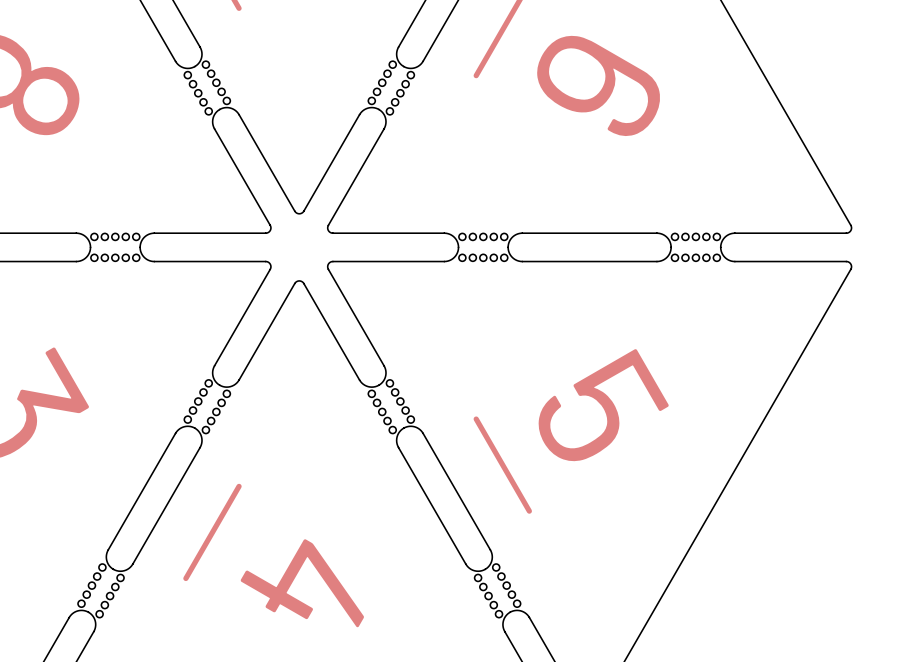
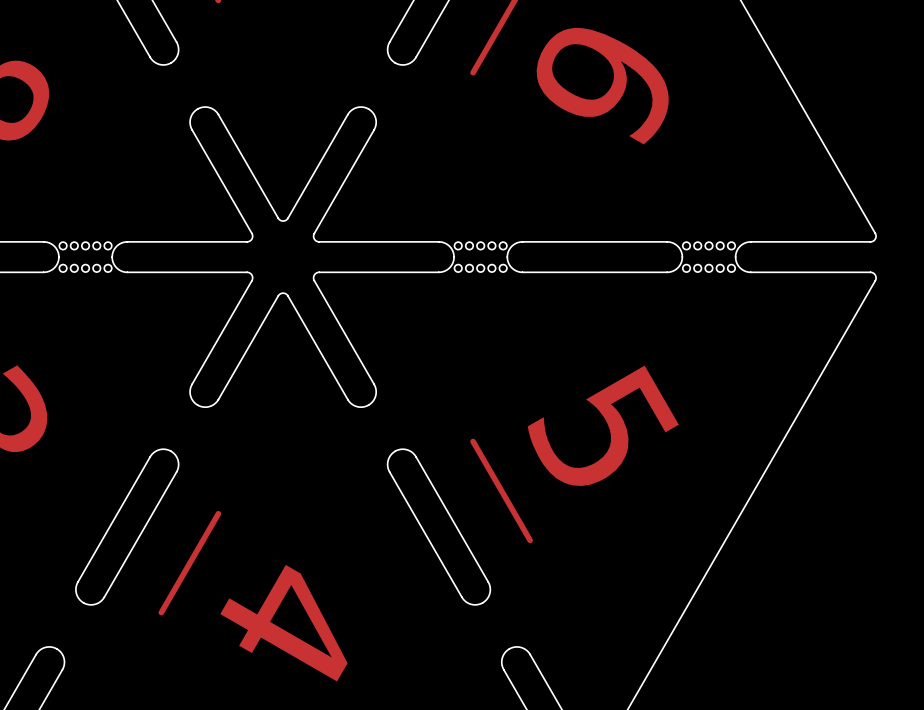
part: (216, 82) -> none
part: (382, 82) -> none
part: (198, 93) -> none
part: (400, 93) -> none
part: (198, 401) -> none
part: (400, 401) -> none
part: (216, 411) -> none
part: (382, 411) -> none
part: (91, 585) -> none
part: (506, 585) -> none
part: (110, 596) -> none
part: (488, 596) -> none

